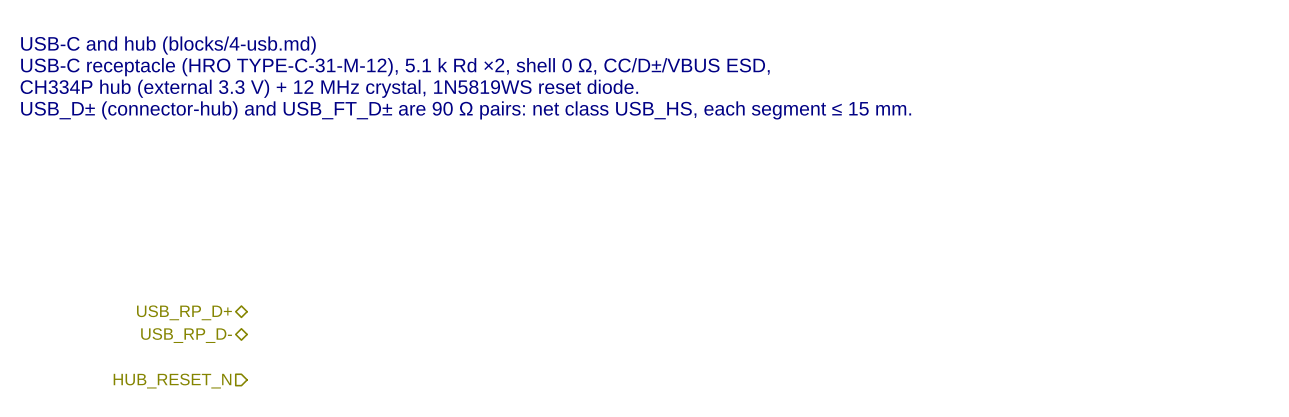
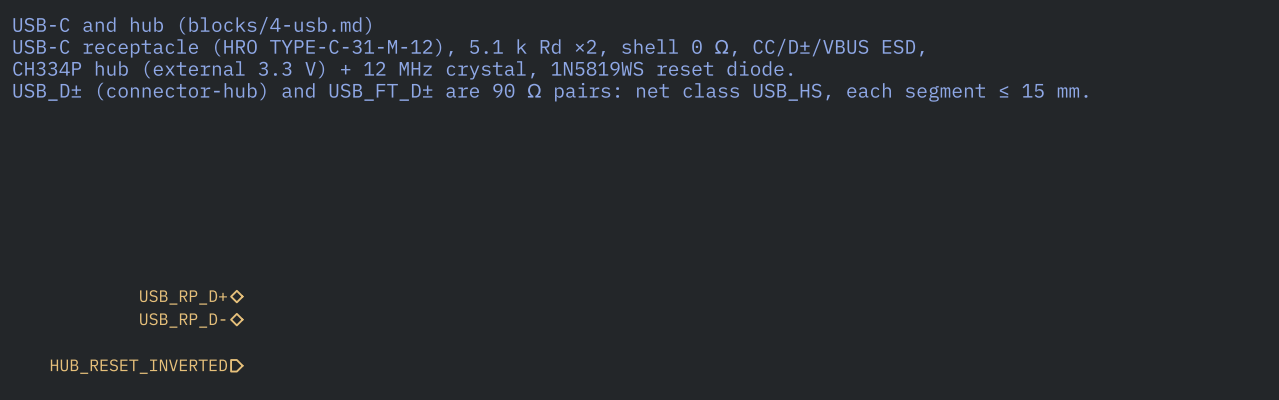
hierarchical label: HUB_RESET_N (172, 381) -> HUB_RESET_INVERTED (138, 366)

